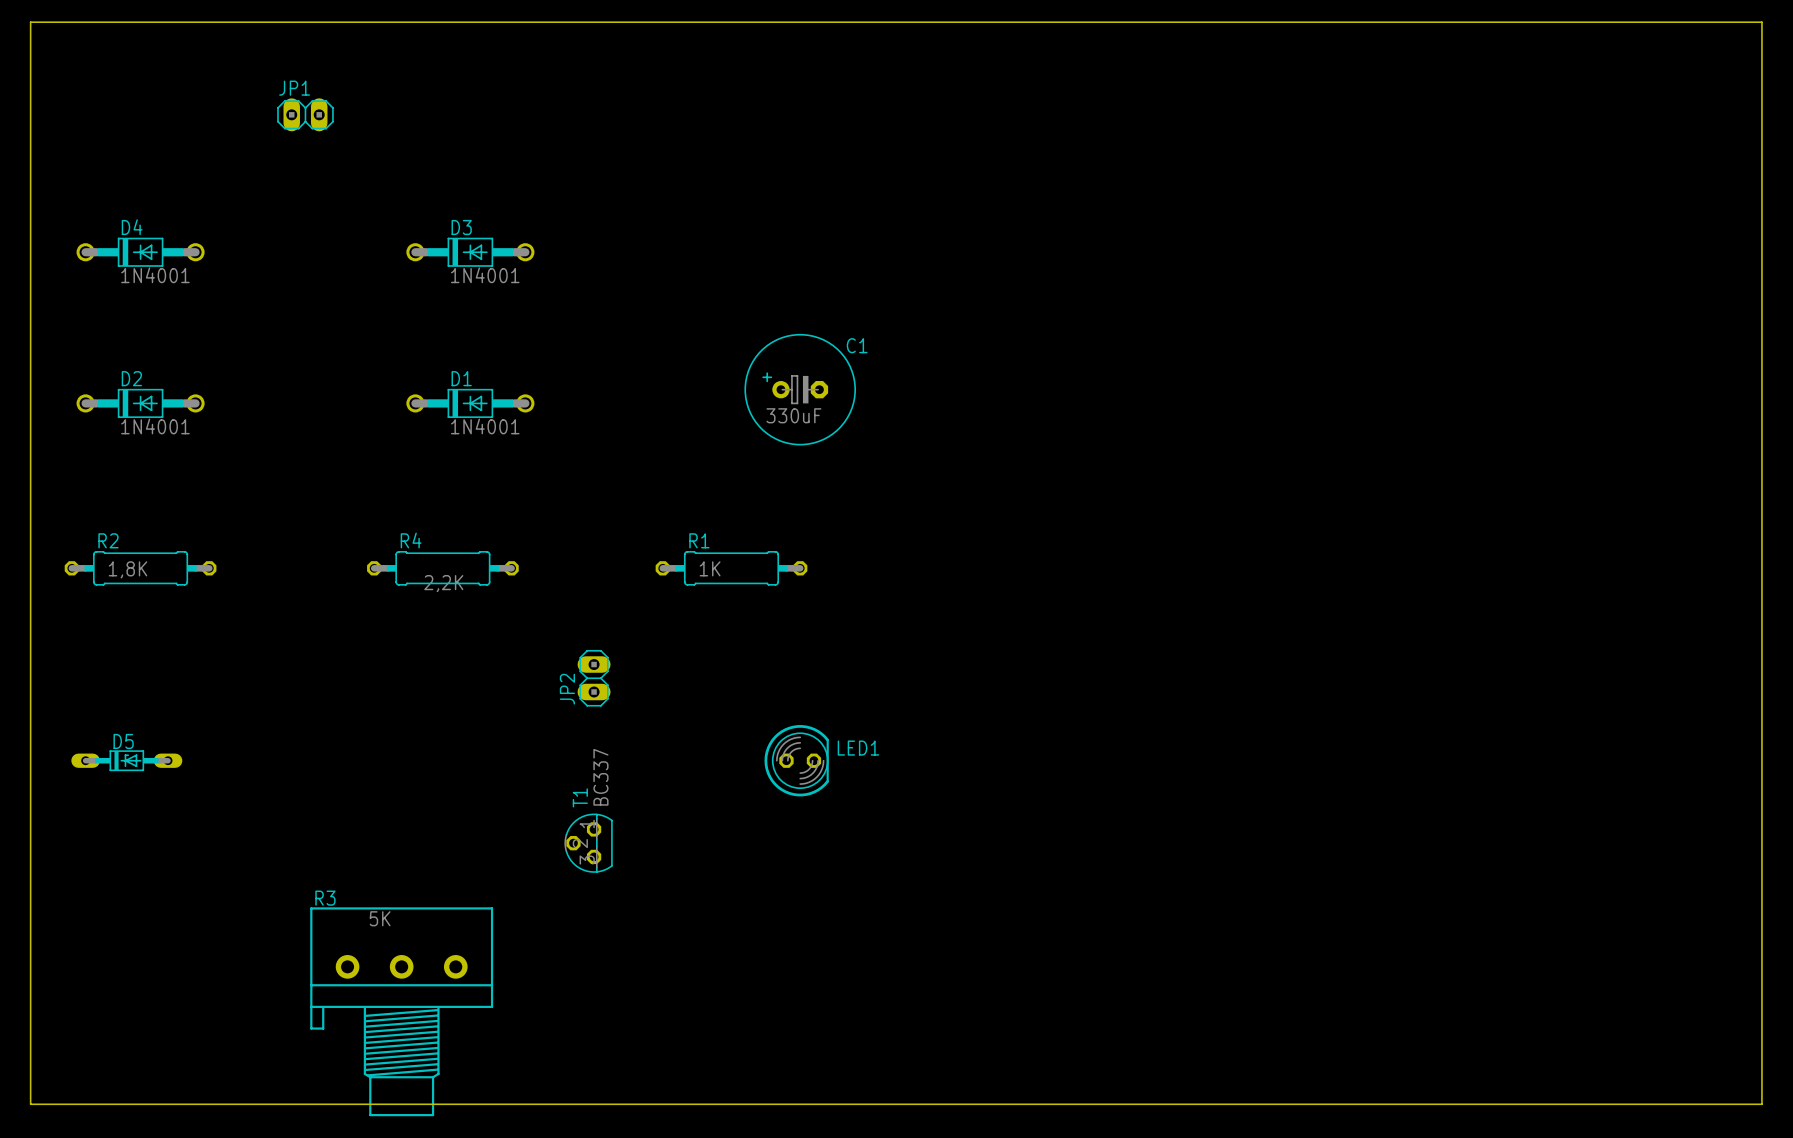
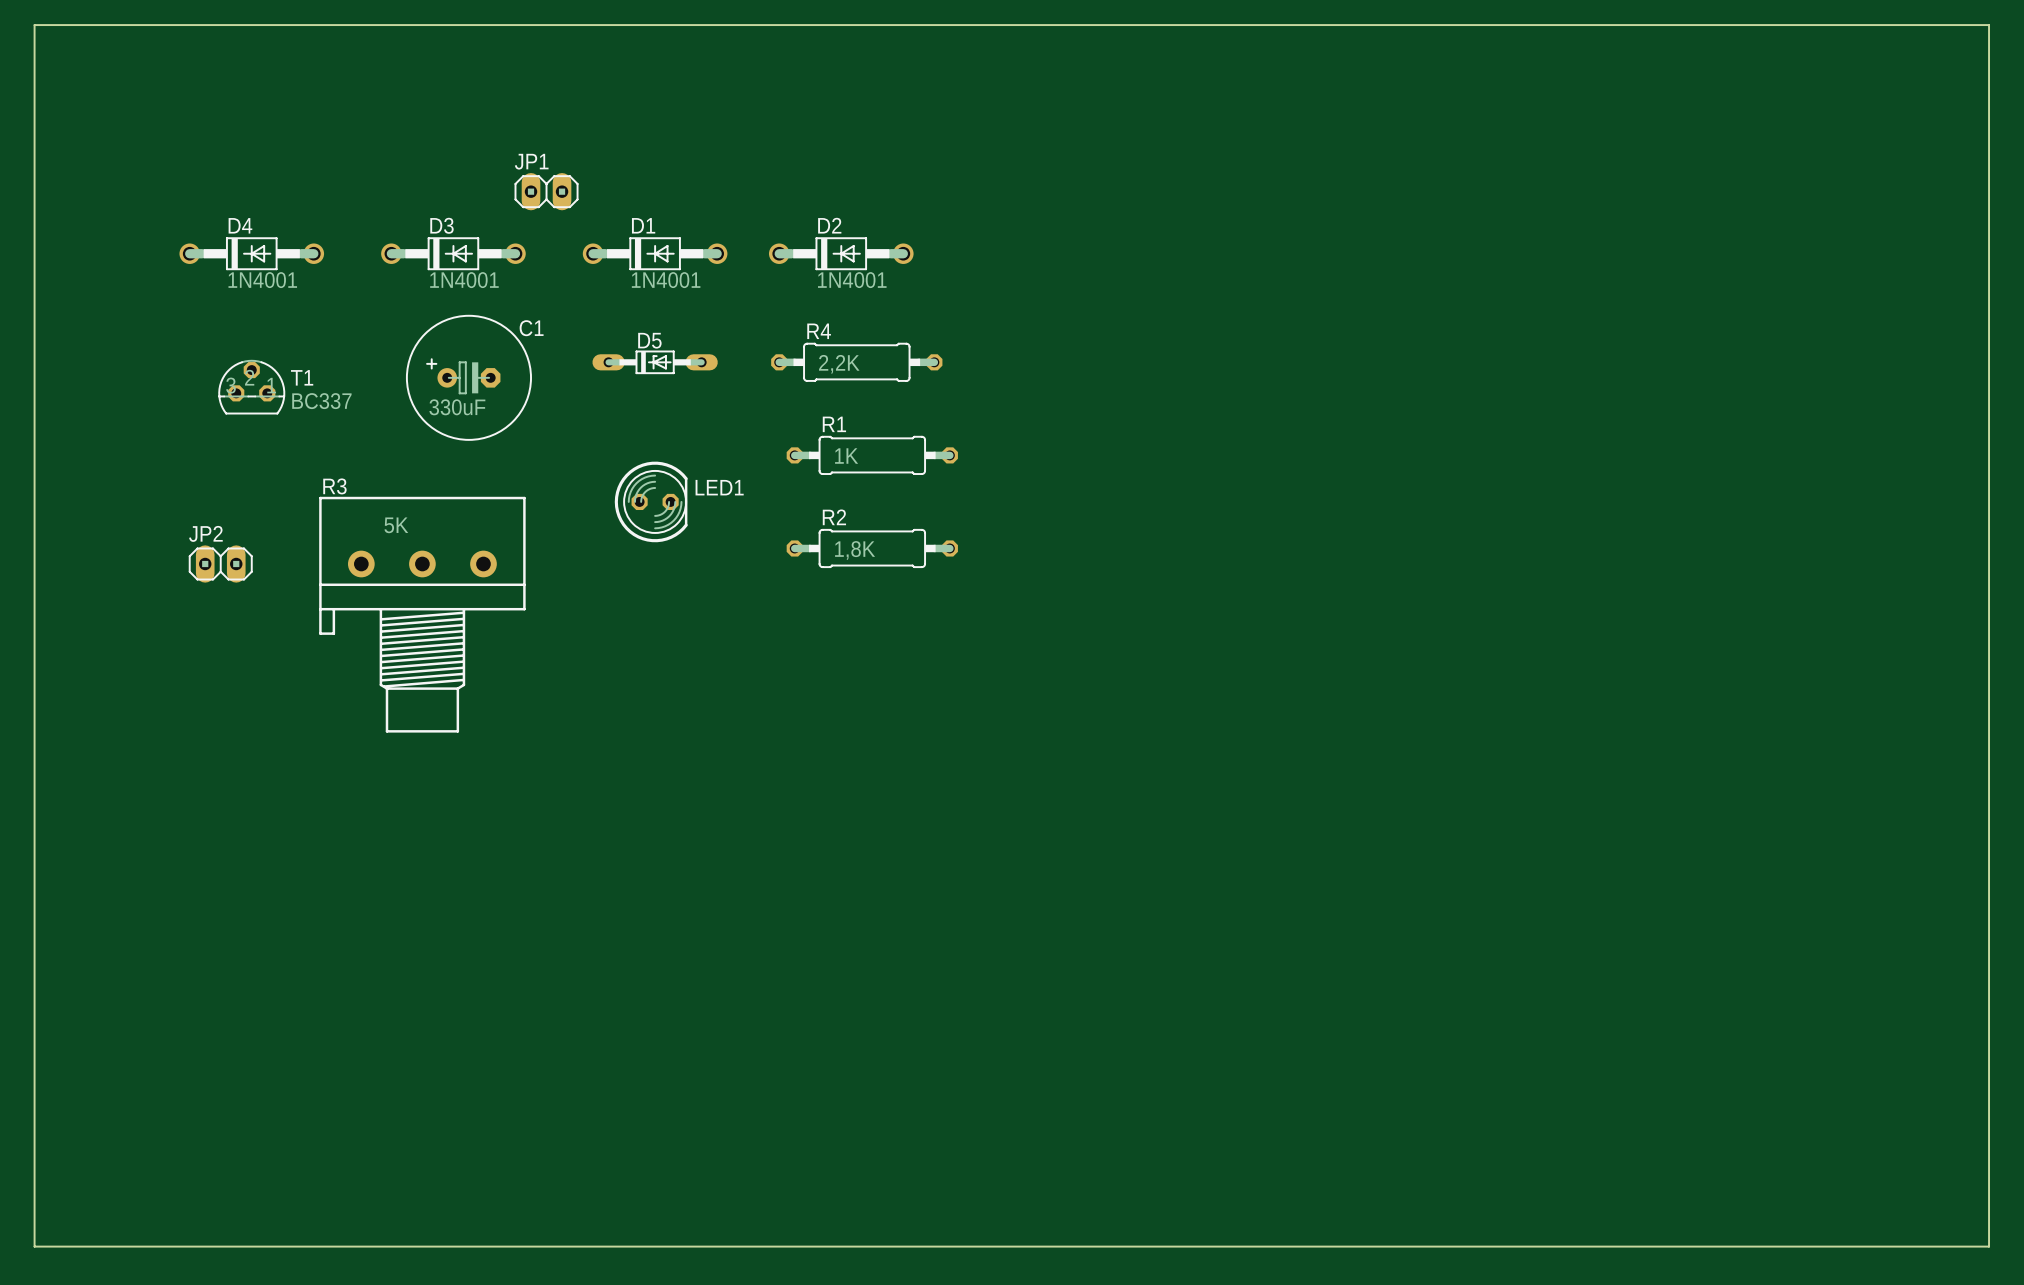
JP1 position: (305, 114) -> (546, 191)
D4 position: (140, 252) -> (251, 253)
D3 position: (470, 252) -> (453, 253)
C1 position: (800, 389) -> (468, 377)
D2 position: (140, 403) -> (841, 253)
D1 position: (470, 403) -> (655, 253)
R2 position: (140, 568) -> (872, 548)
R4 position: (442, 568) -> (856, 362)
R1 position: (731, 568) -> (872, 455)
R4 value position: 2,2K (443, 583) -> 2,2K (839, 364)
JP2 rotation: 0° (594, 678) -> 90° clockwise (220, 564)
JP2 position: (594, 678) -> (220, 564)
D5 position: (126, 760) -> (655, 362)
LED1 position: (796, 760) -> (651, 501)
T1 rotation: 0° (588, 843) -> 90° clockwise (251, 387)
T1 position: (588, 843) -> (251, 387)
R3 value position: 5K (380, 918) -> 5K (396, 525)
R3 position: (401, 1011) -> (422, 614)

